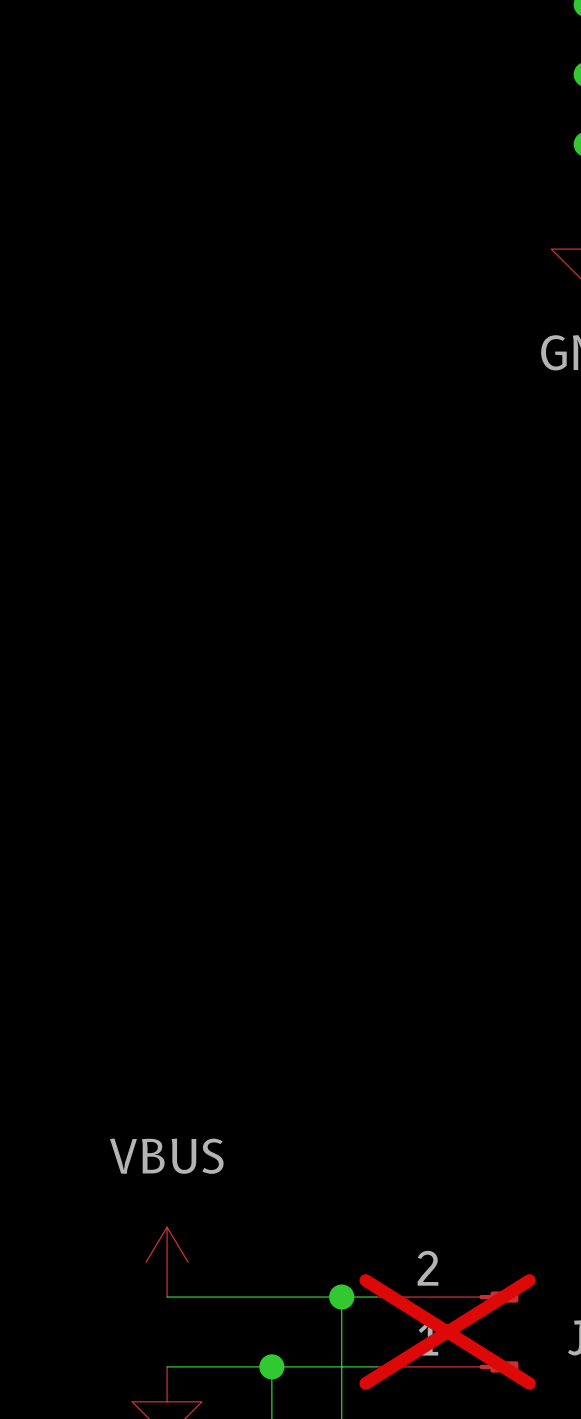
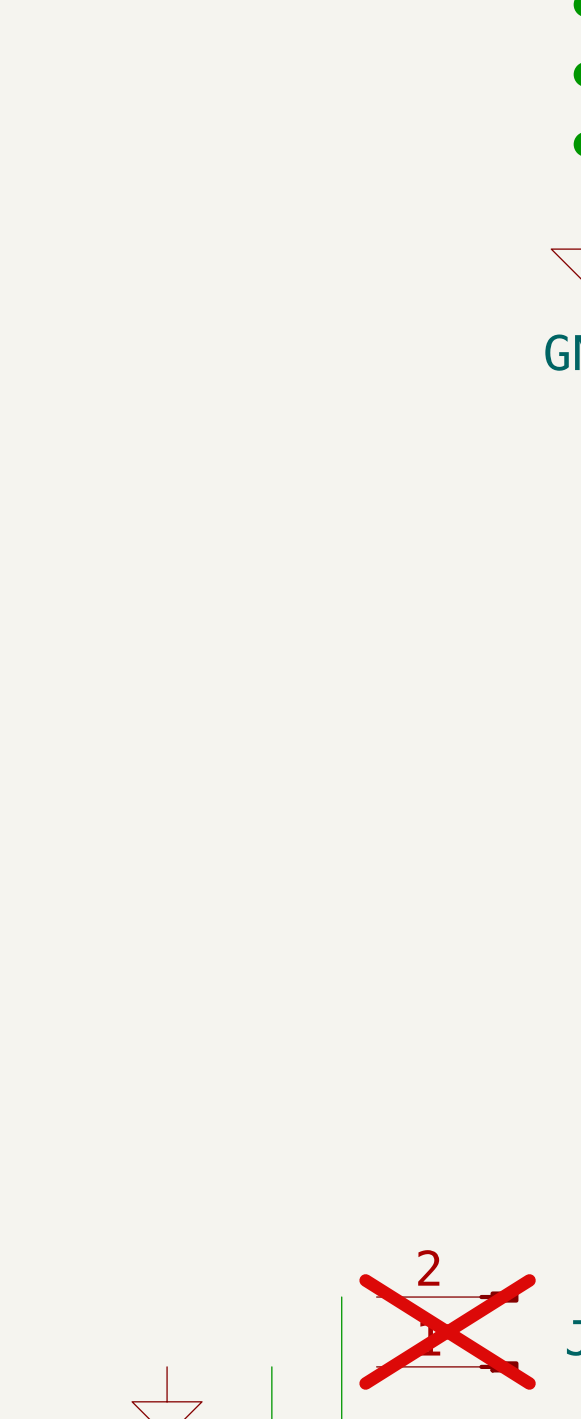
power symbol: VBUS (167, 1262) -> none
wire: (167, 1297) (376, 1297) -> none
junction: (341, 1297) -> none
wire: (167, 1366) (376, 1366) -> none
junction: (271, 1366) -> none

